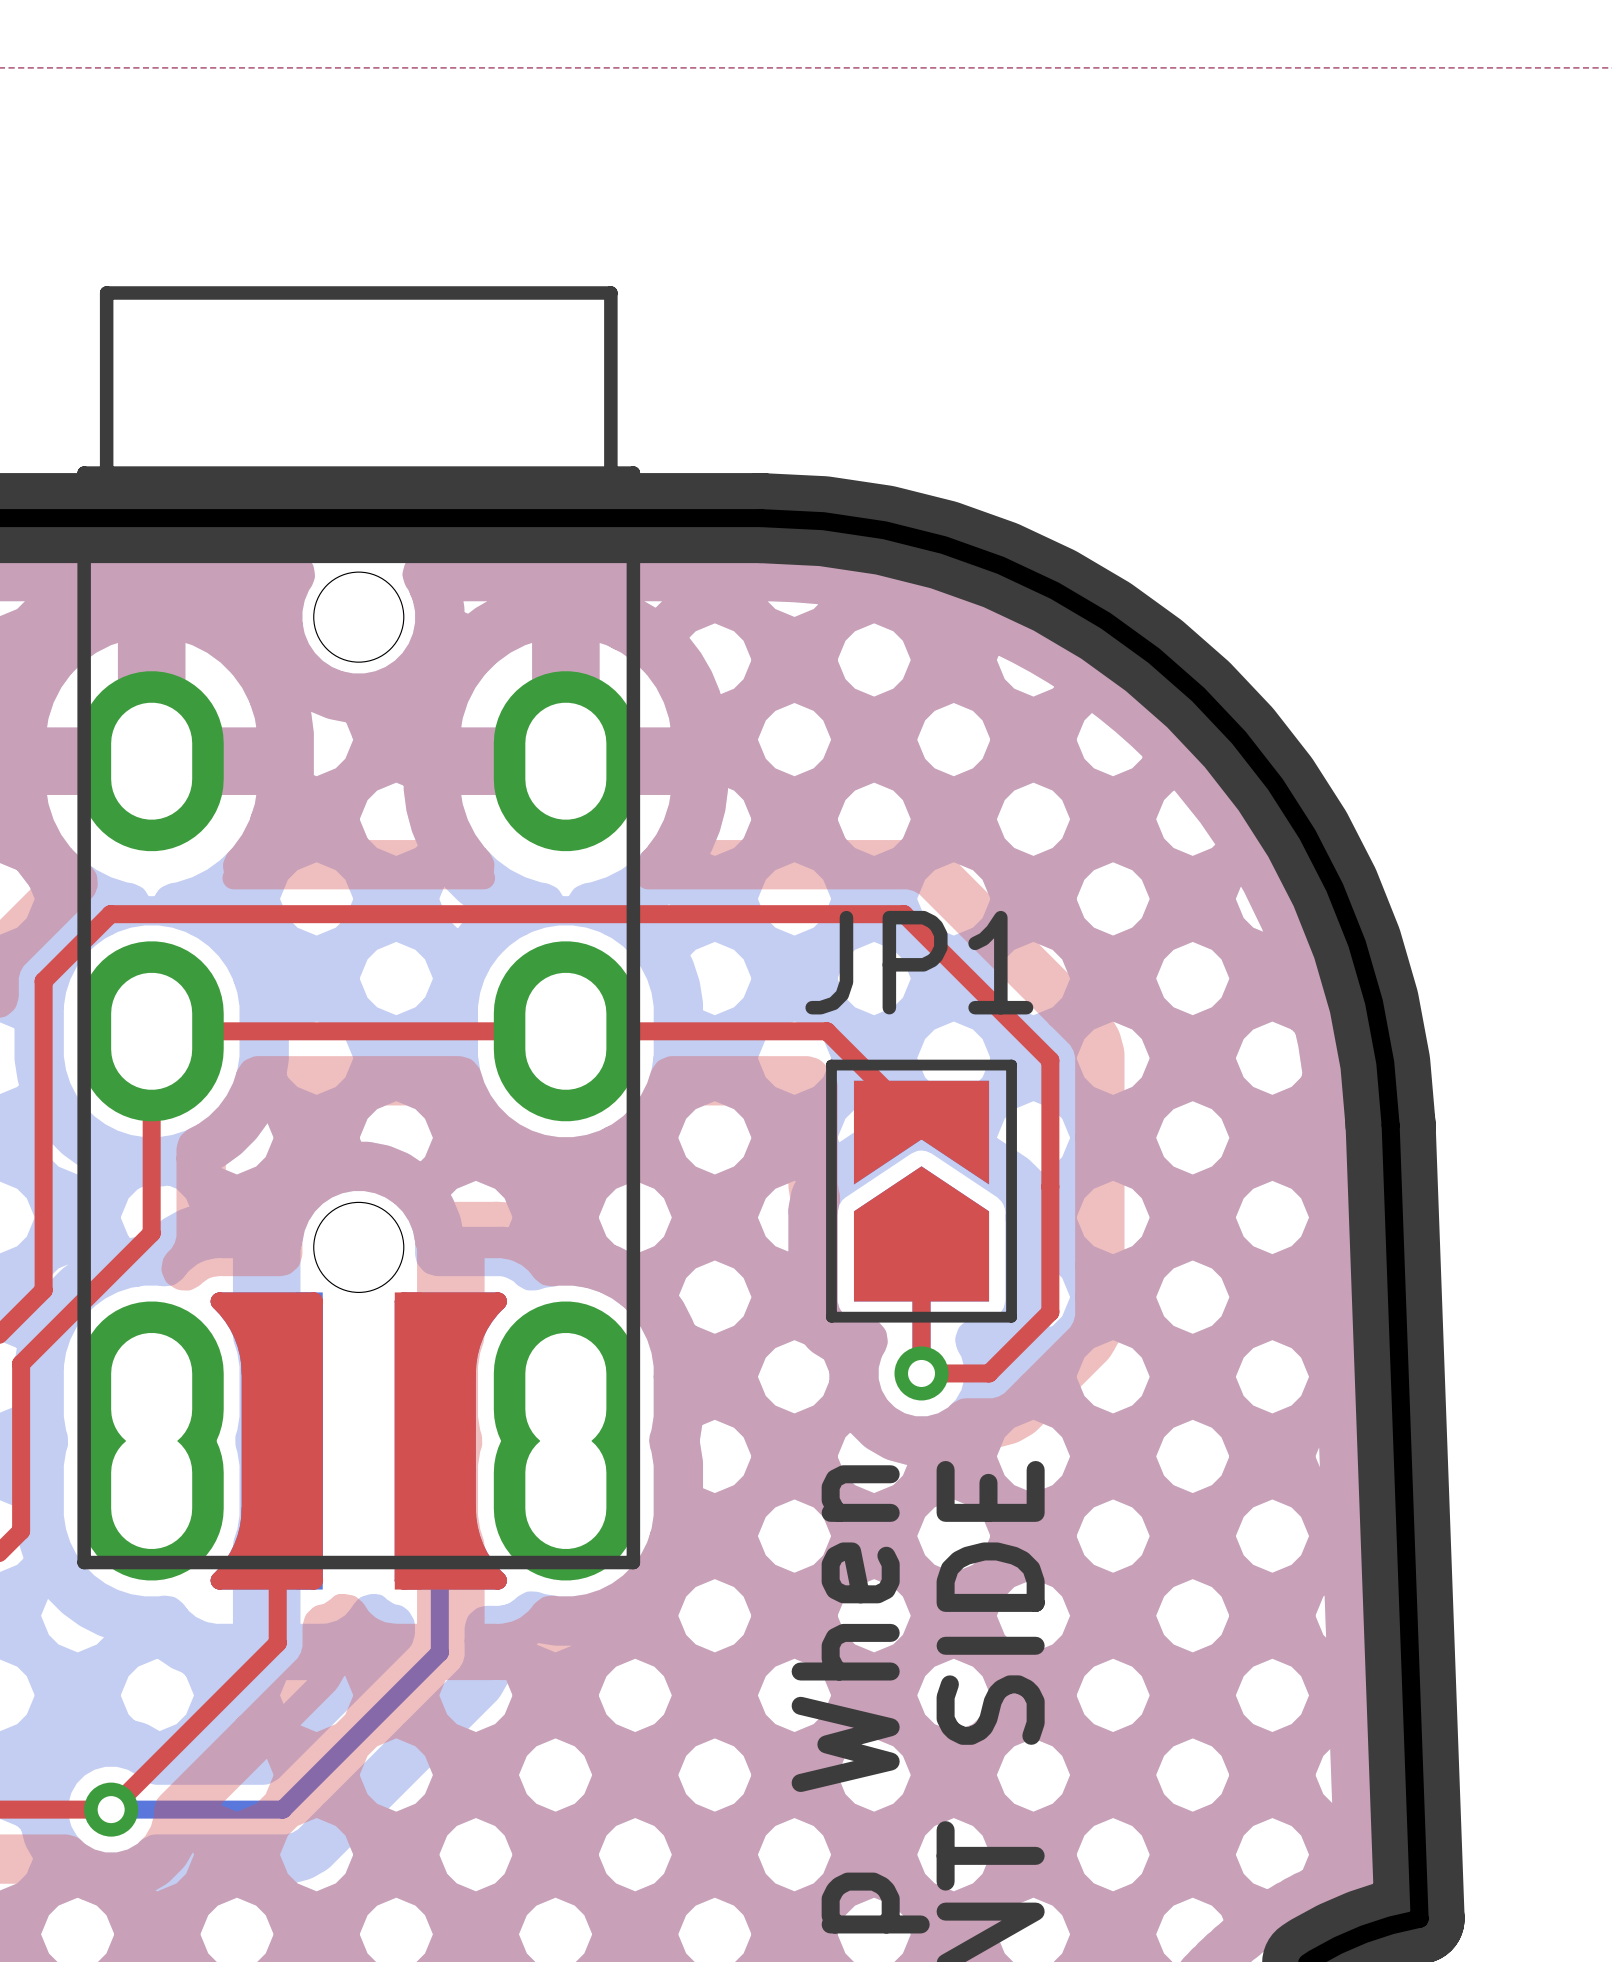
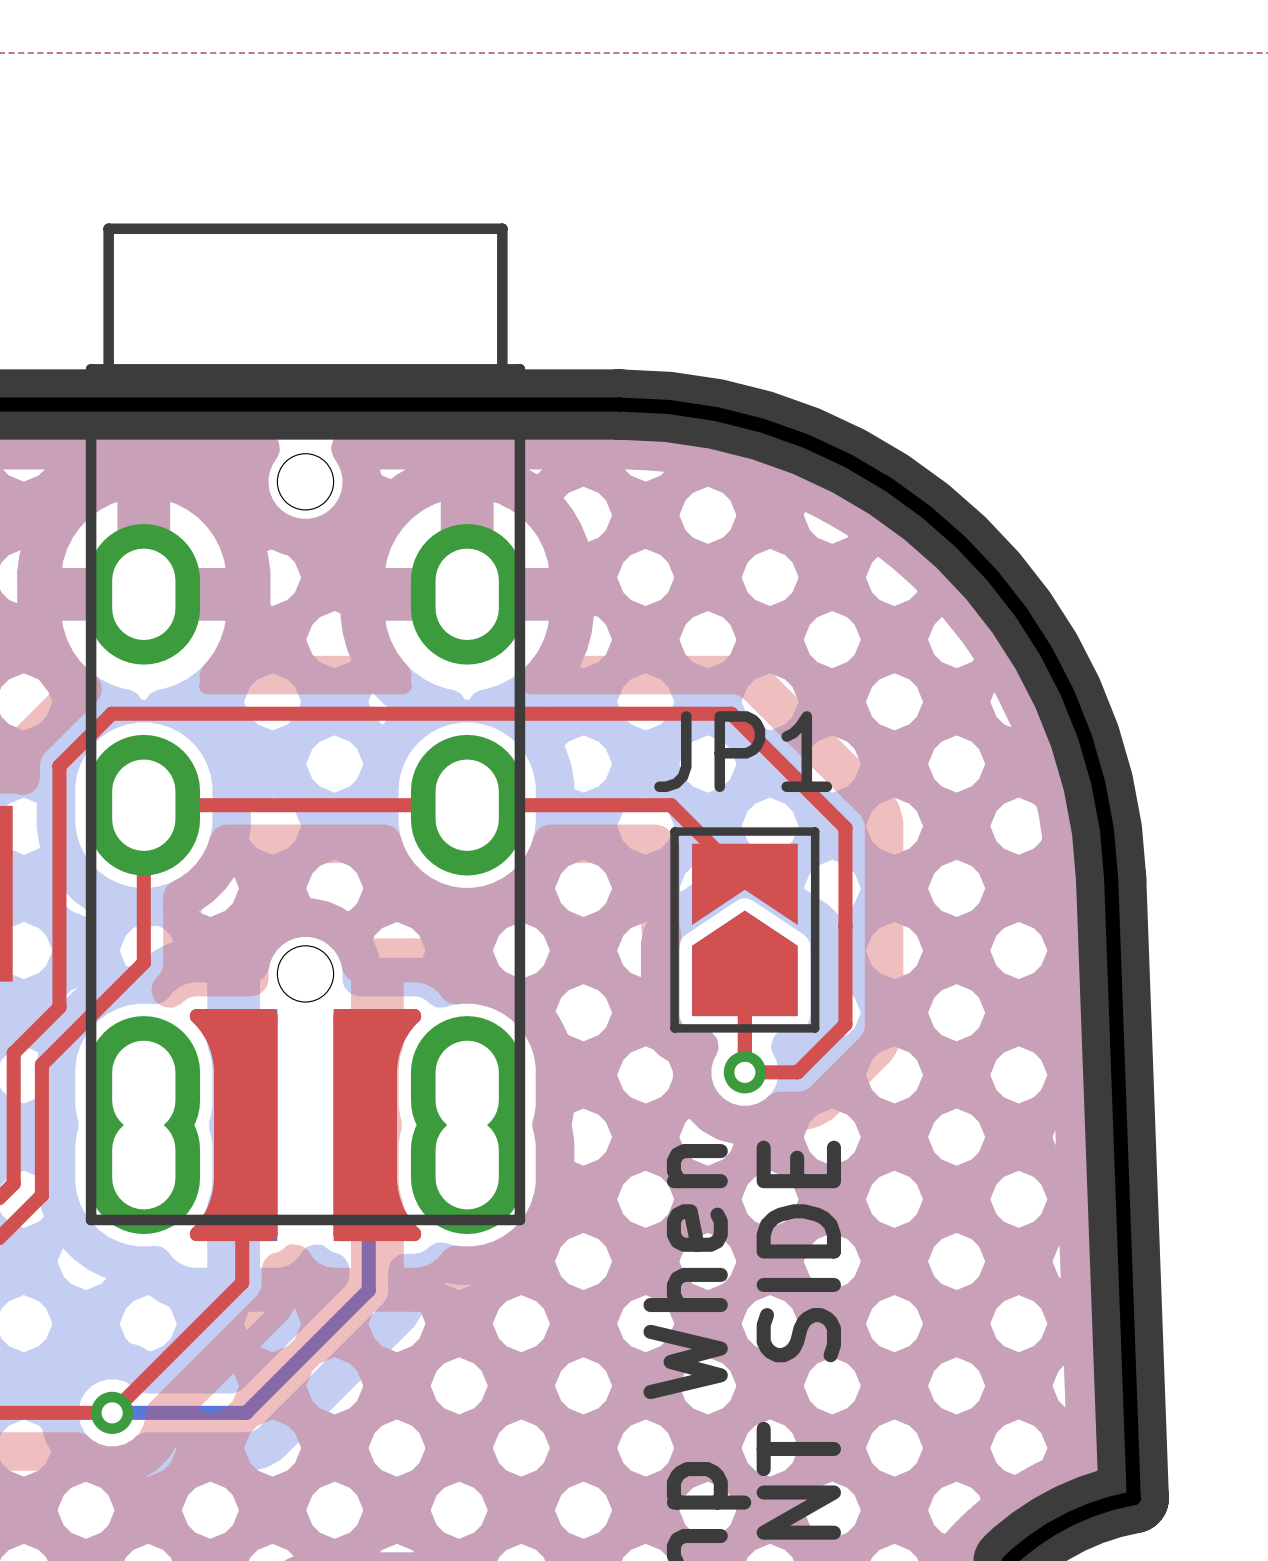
part footprint: [77, 286, 641, 1590] -> [85, 223, 526, 1242]

